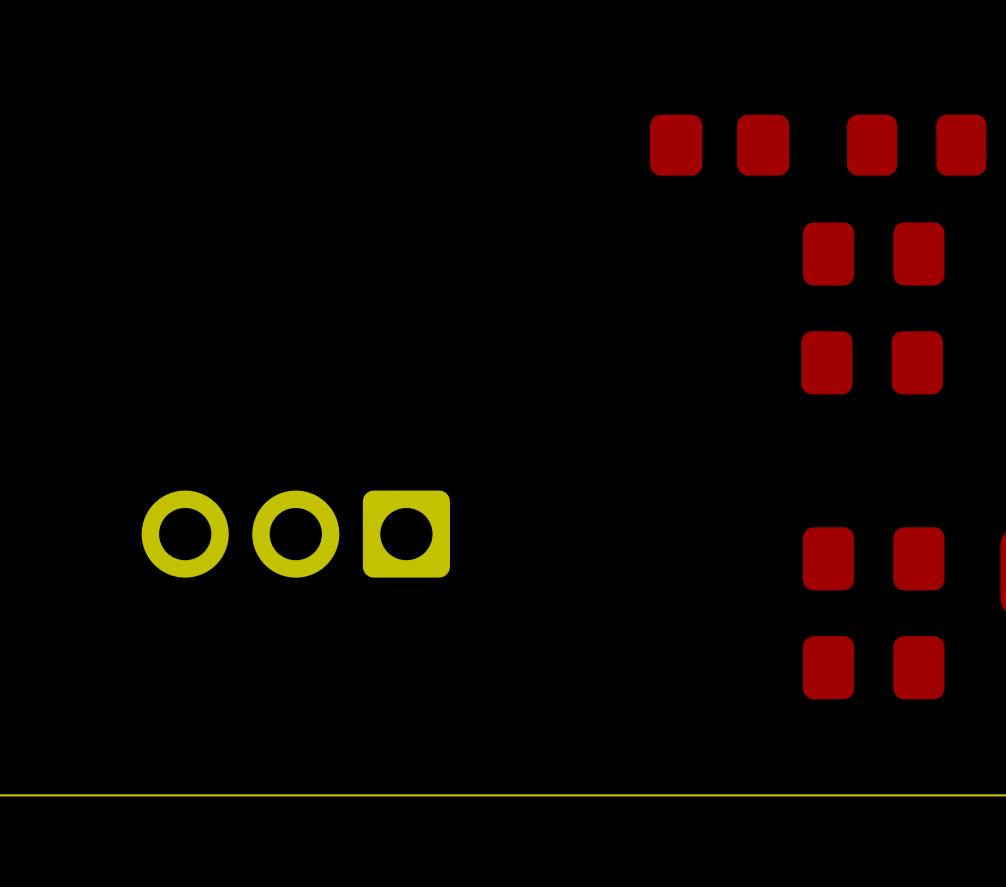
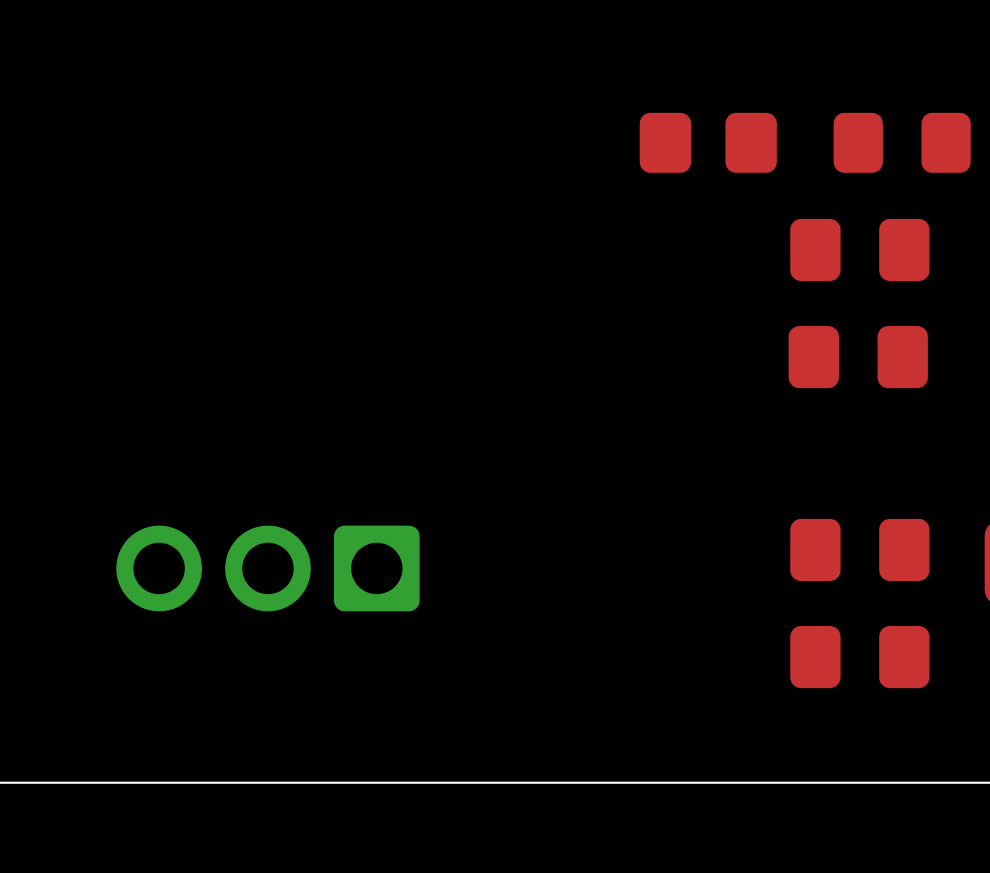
part position: (295, 534) -> (267, 568)

